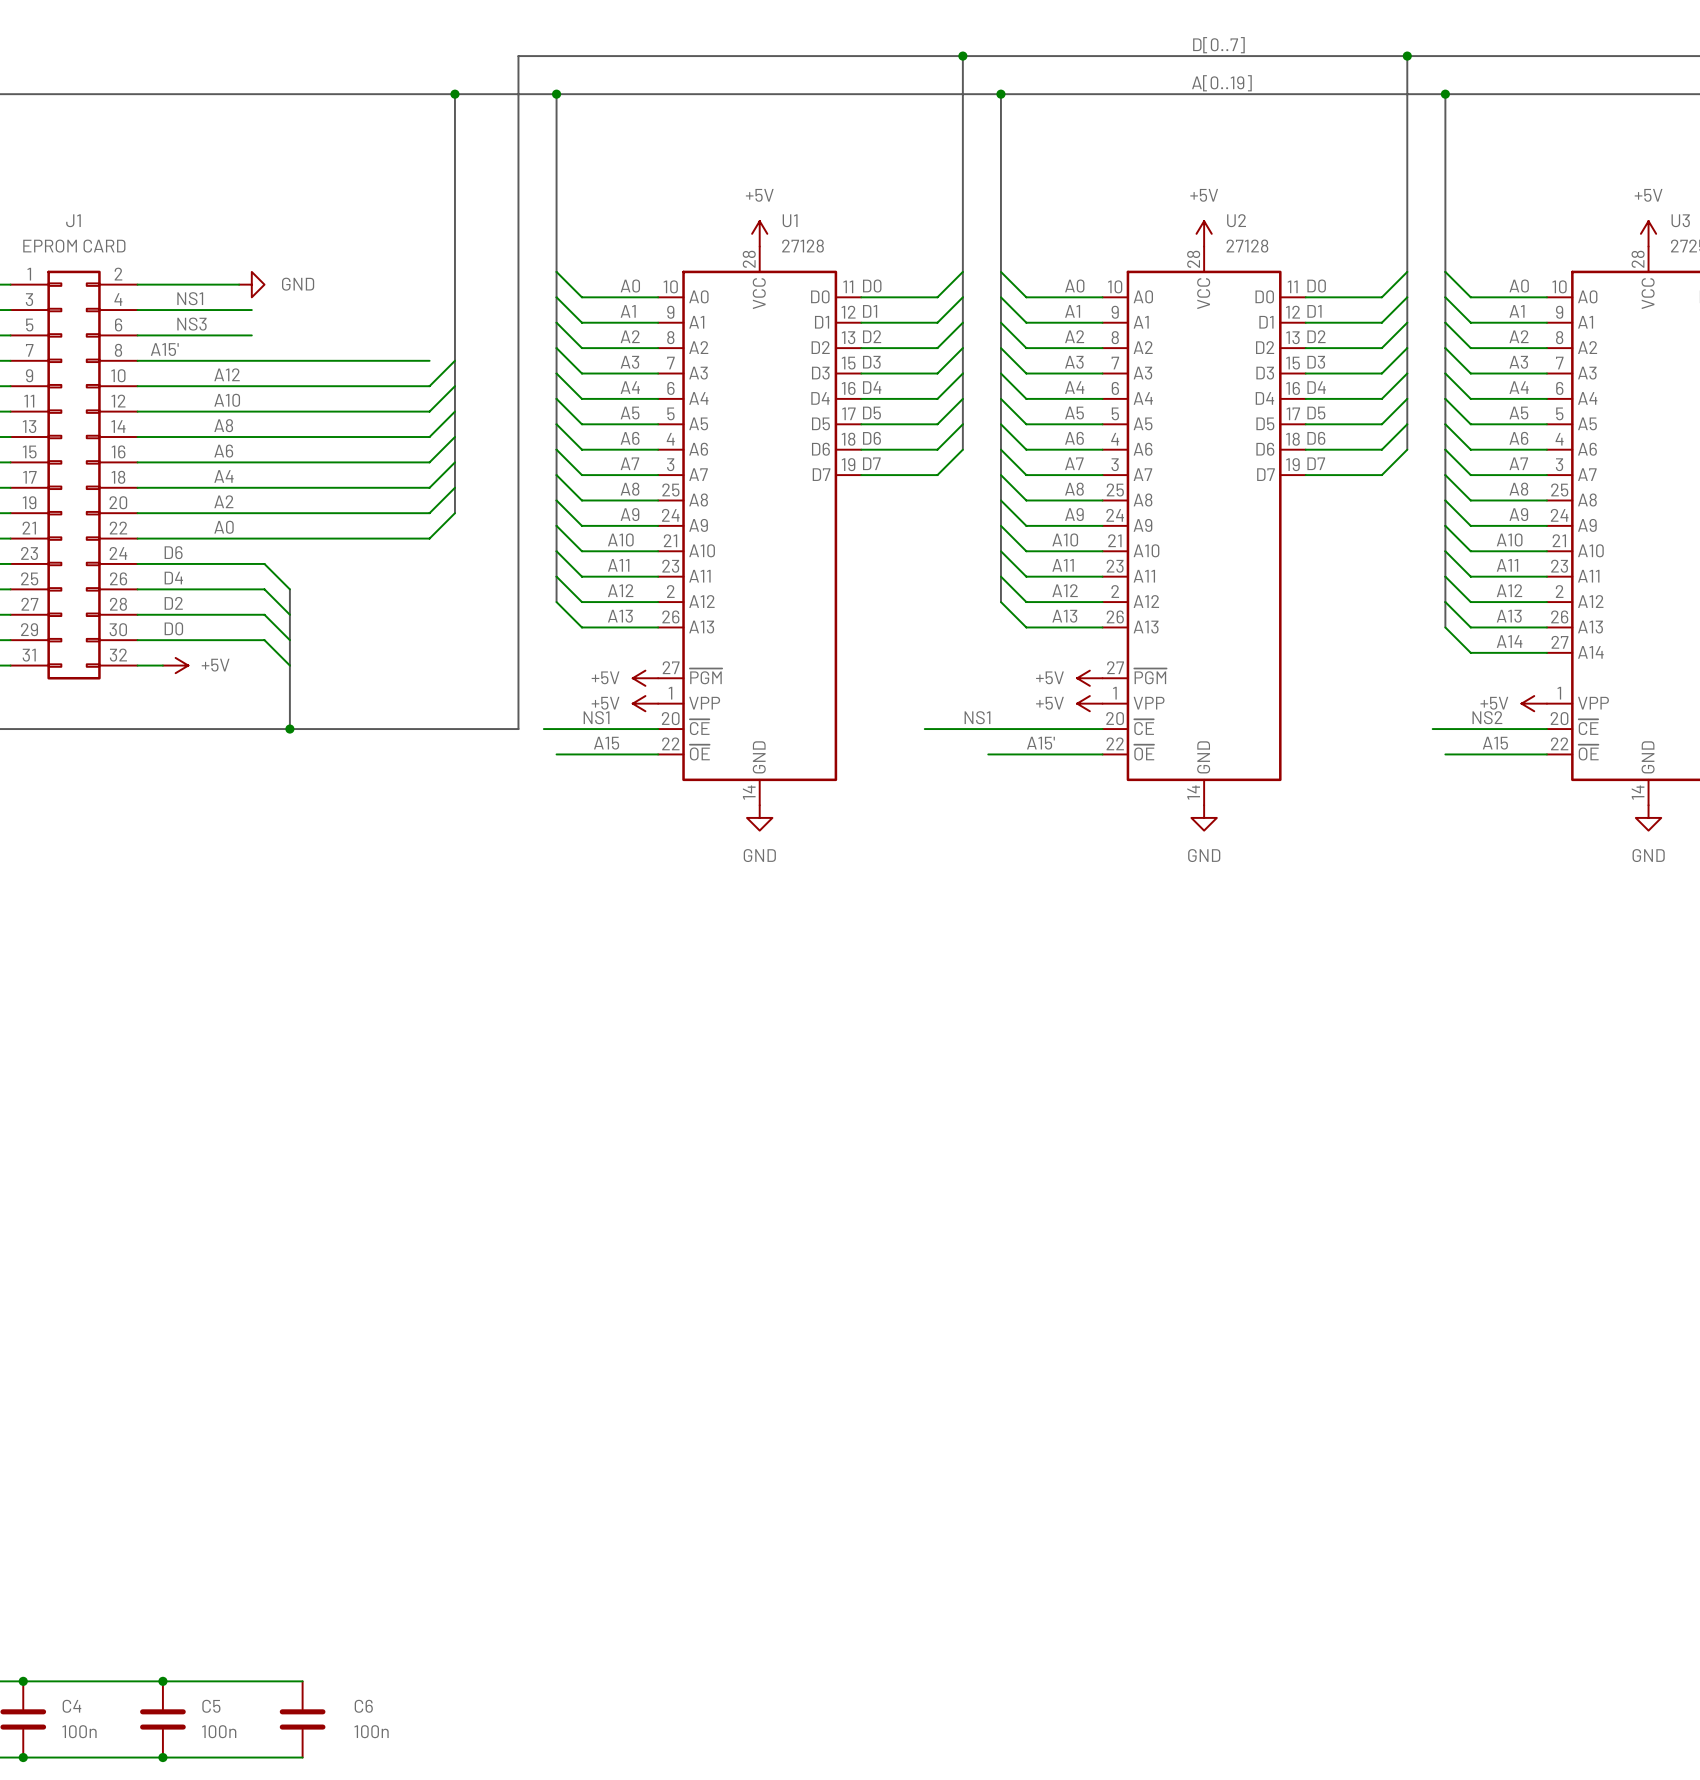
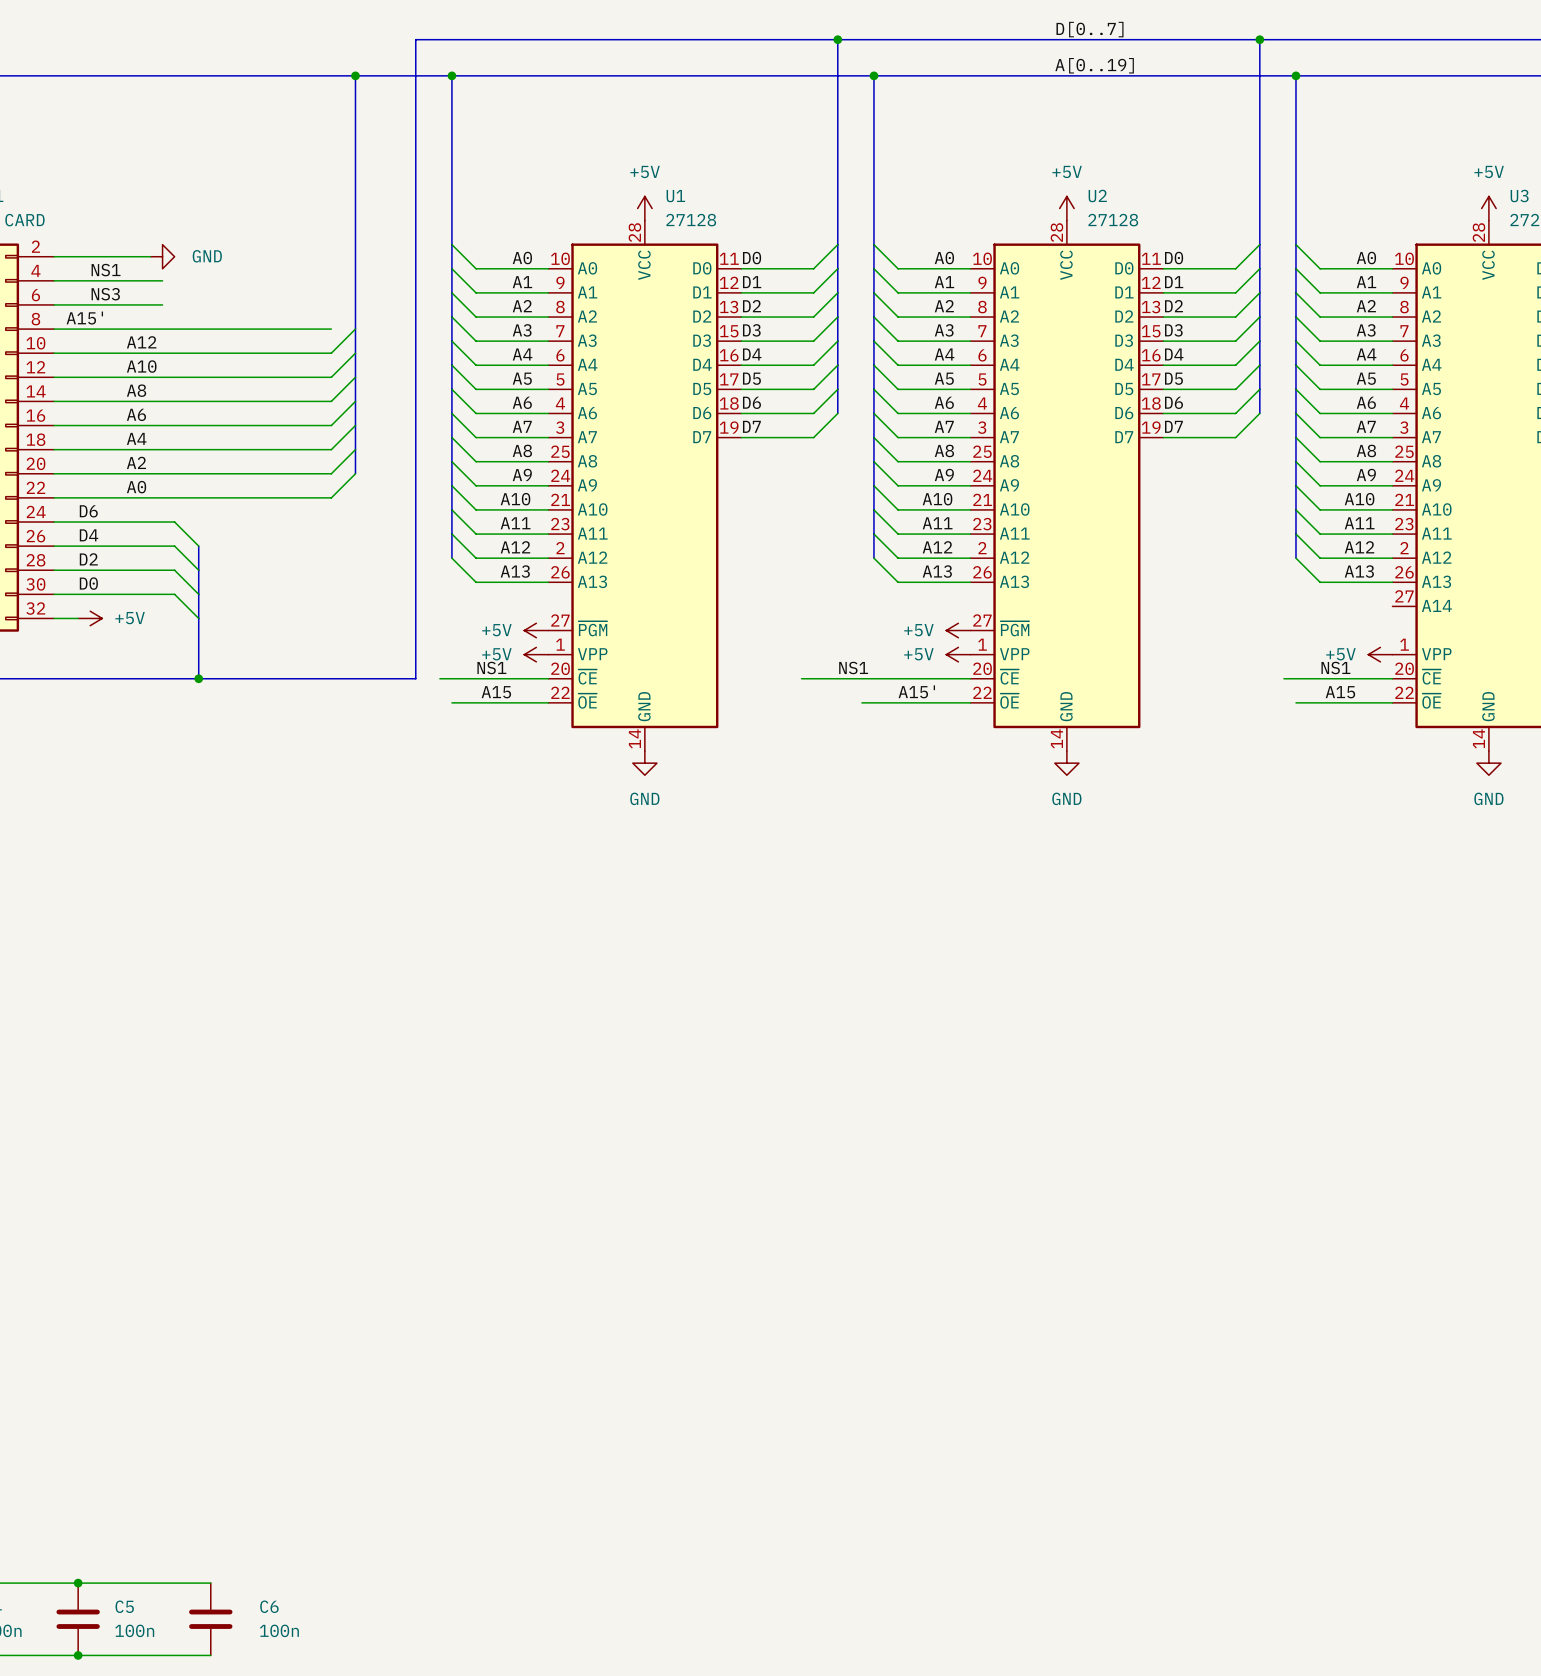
bus: (1445, 602) (1445, 627) -> none
wire: (1445, 627) (1470, 652) (1546, 652) -> none
label: A14 (1509, 641) -> none
label: NS2 (1487, 717) -> NS1 (1335, 667)

